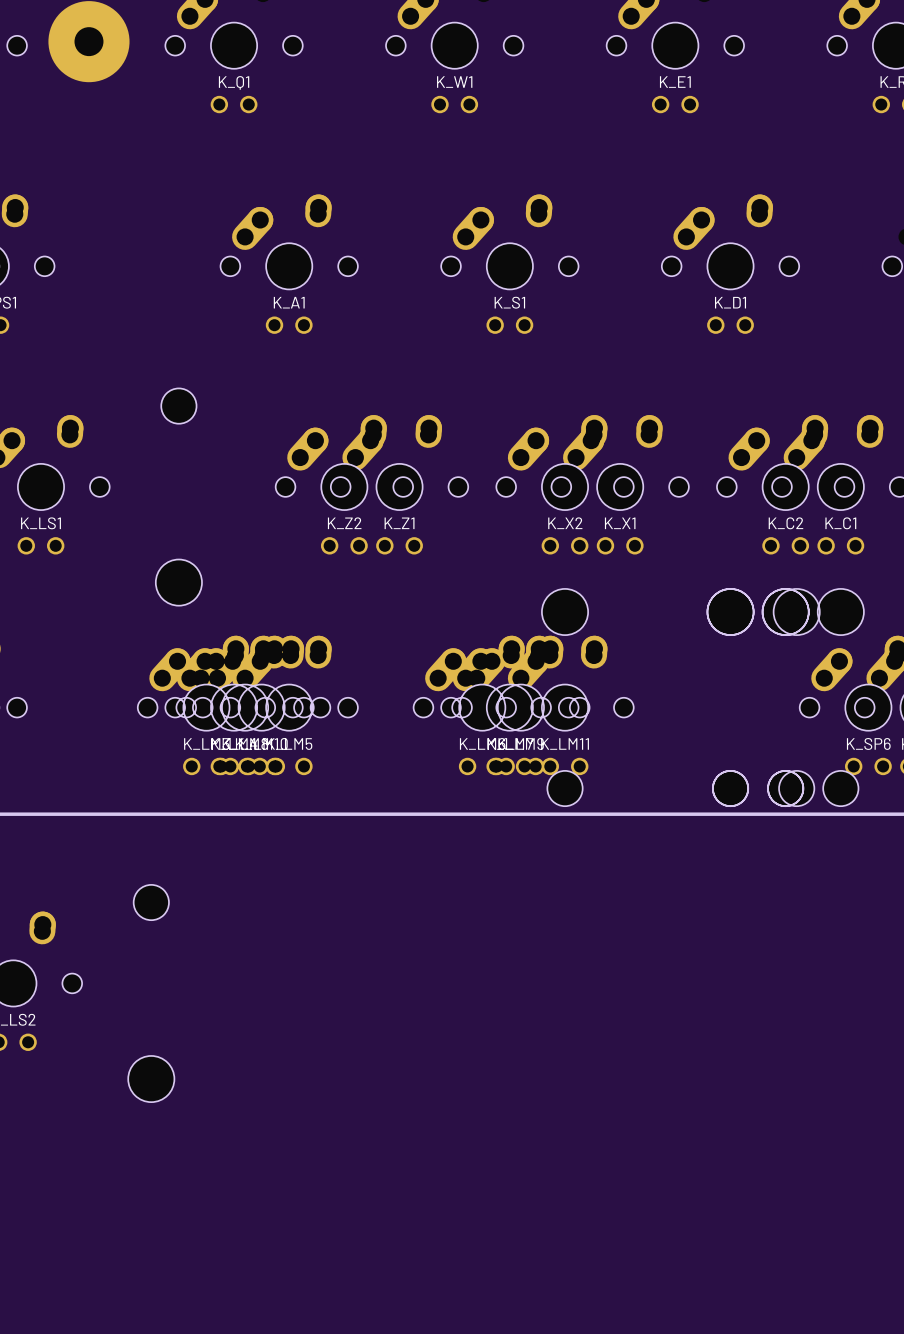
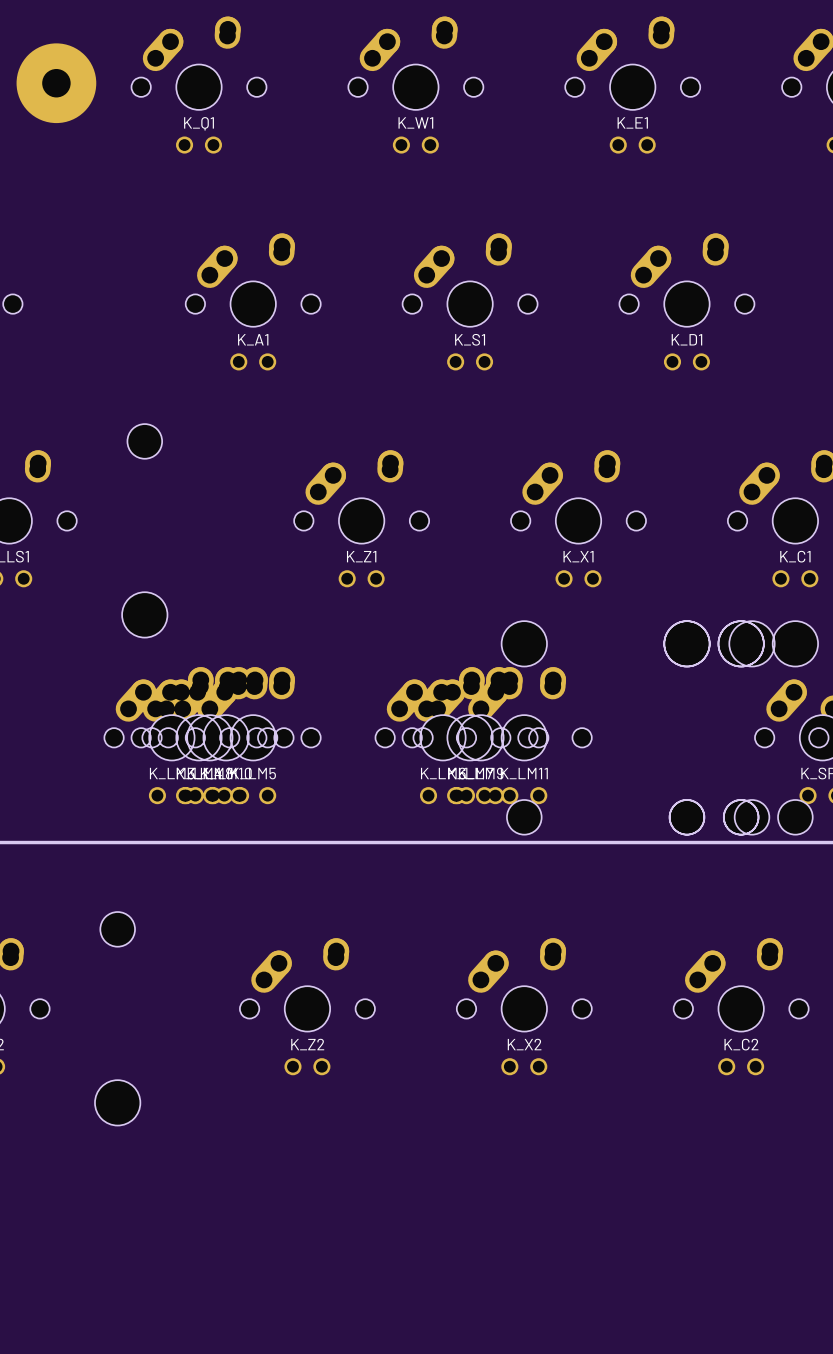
K_Z2 position: (344, 484) -> (307, 1006)
K_X2 position: (565, 484) -> (524, 1006)
K_C2 position: (785, 484) -> (741, 1006)

